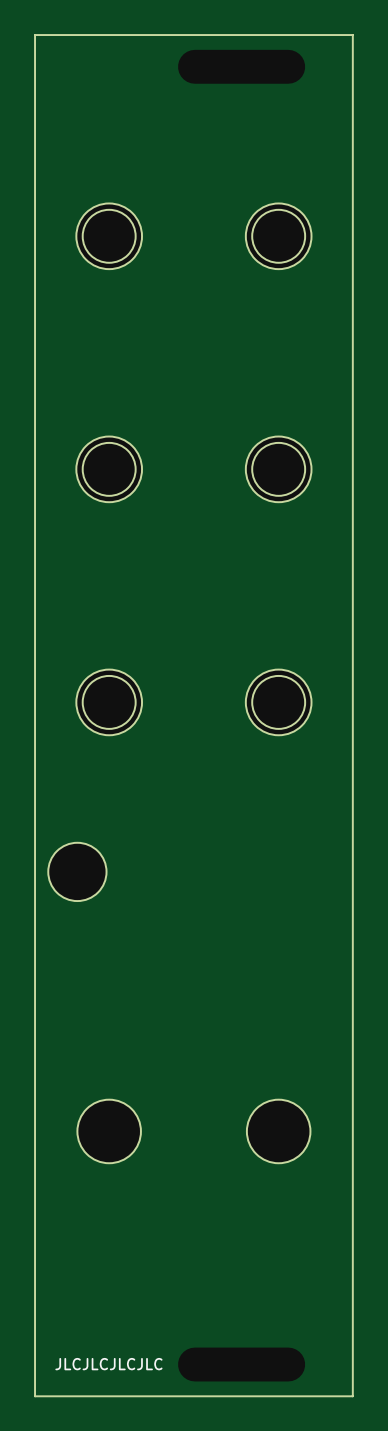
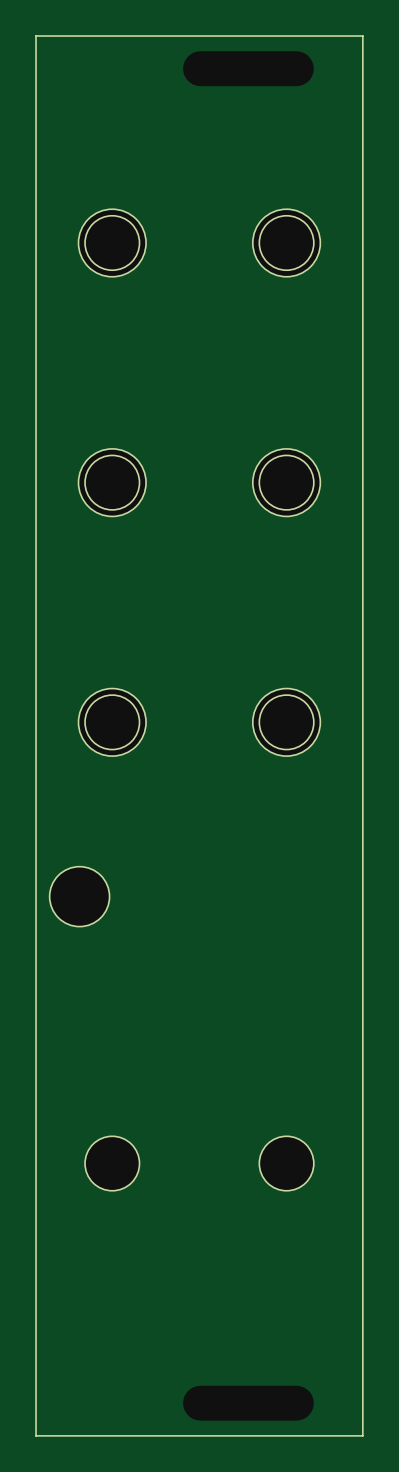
part footprint: [77, 1099, 141, 1164] -> [85, 1136, 140, 1191]
part footprint: [246, 1099, 311, 1164] -> [259, 1136, 314, 1191]
text: JLCJLCJLCJLC (108, 1364) -> none

